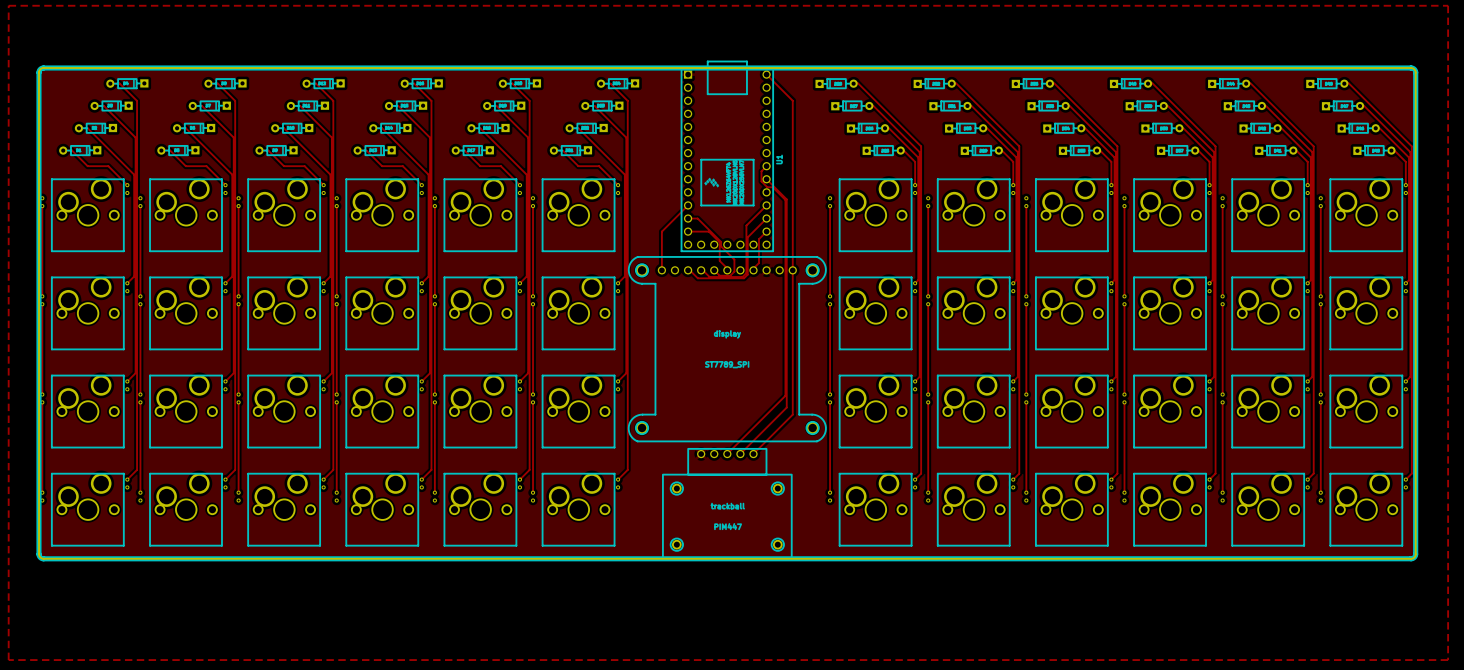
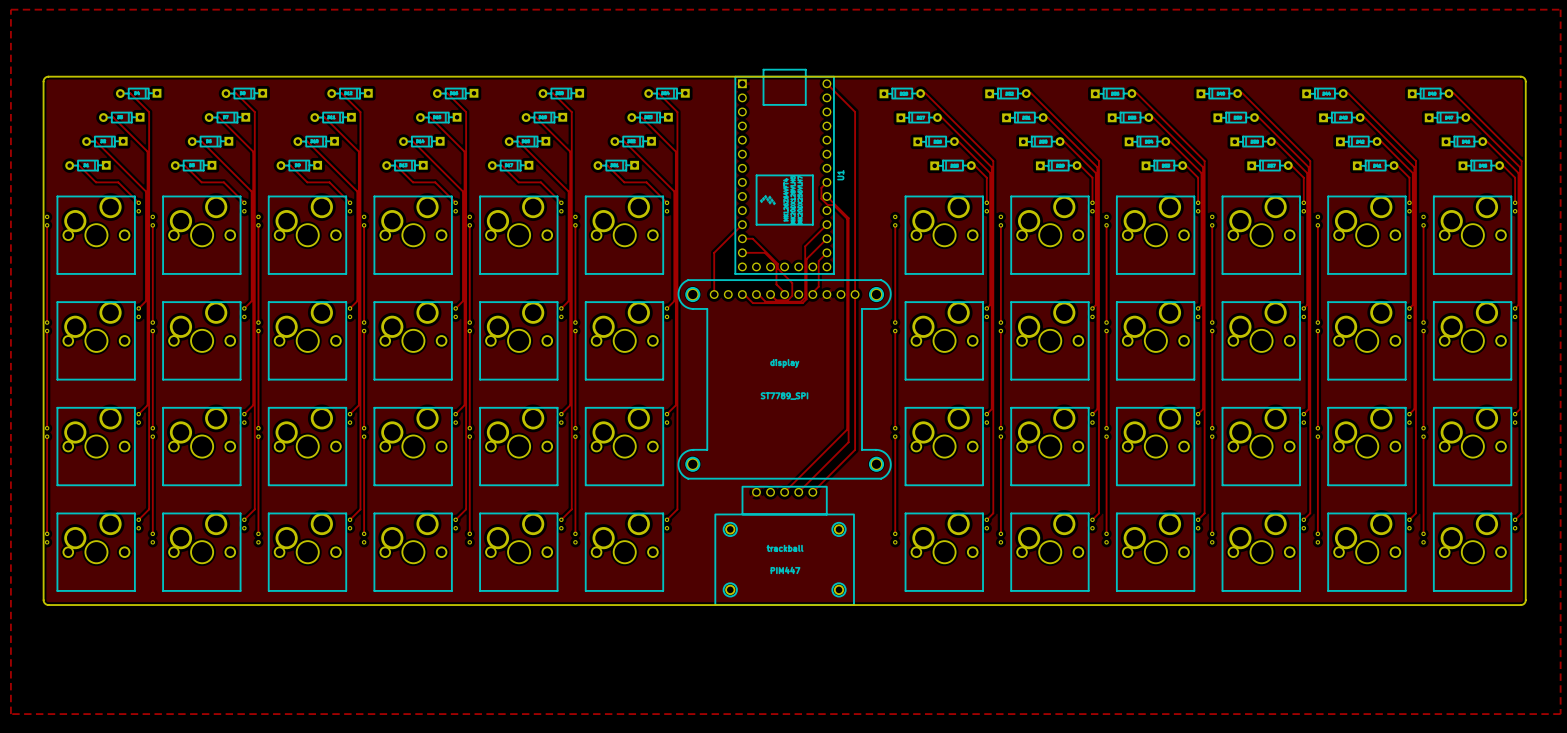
line: (43, 67) (1412, 68) (1415, 72) (1415, 555) (1411, 558) (42, 558) (38, 554) (38, 72) (43, 67) -> none

